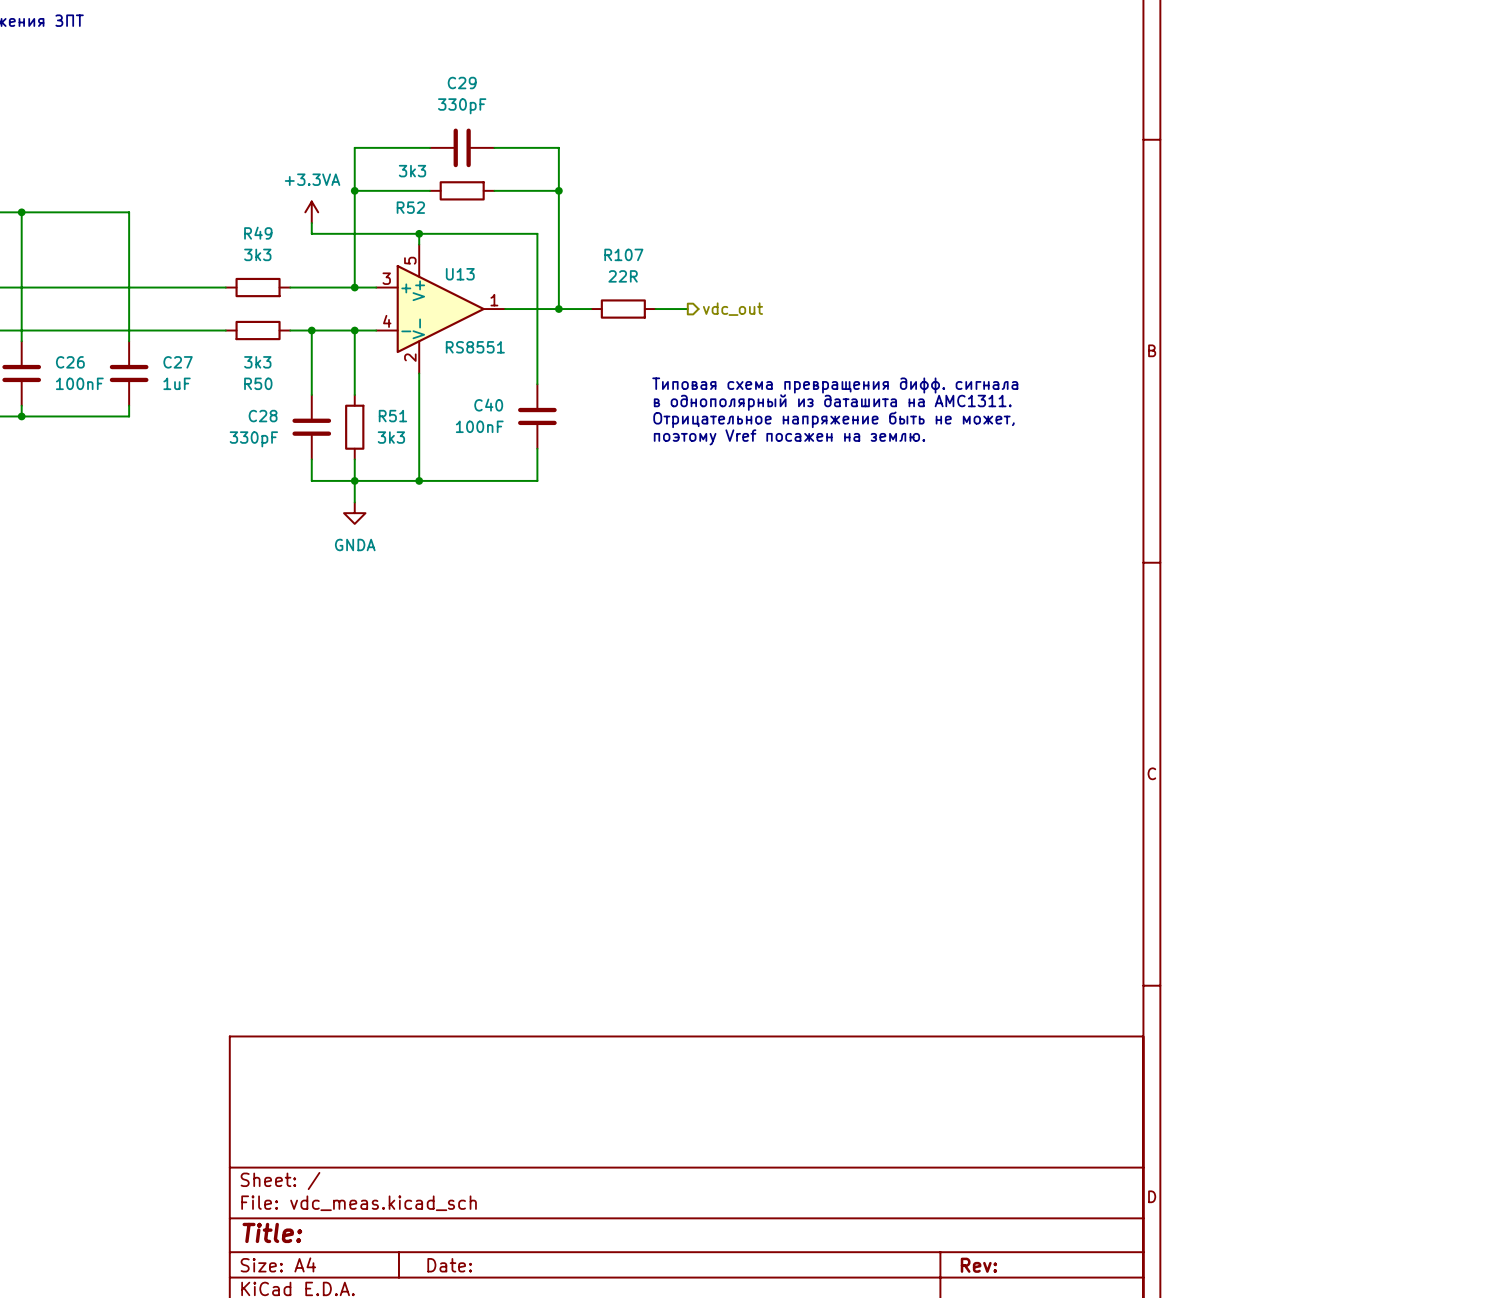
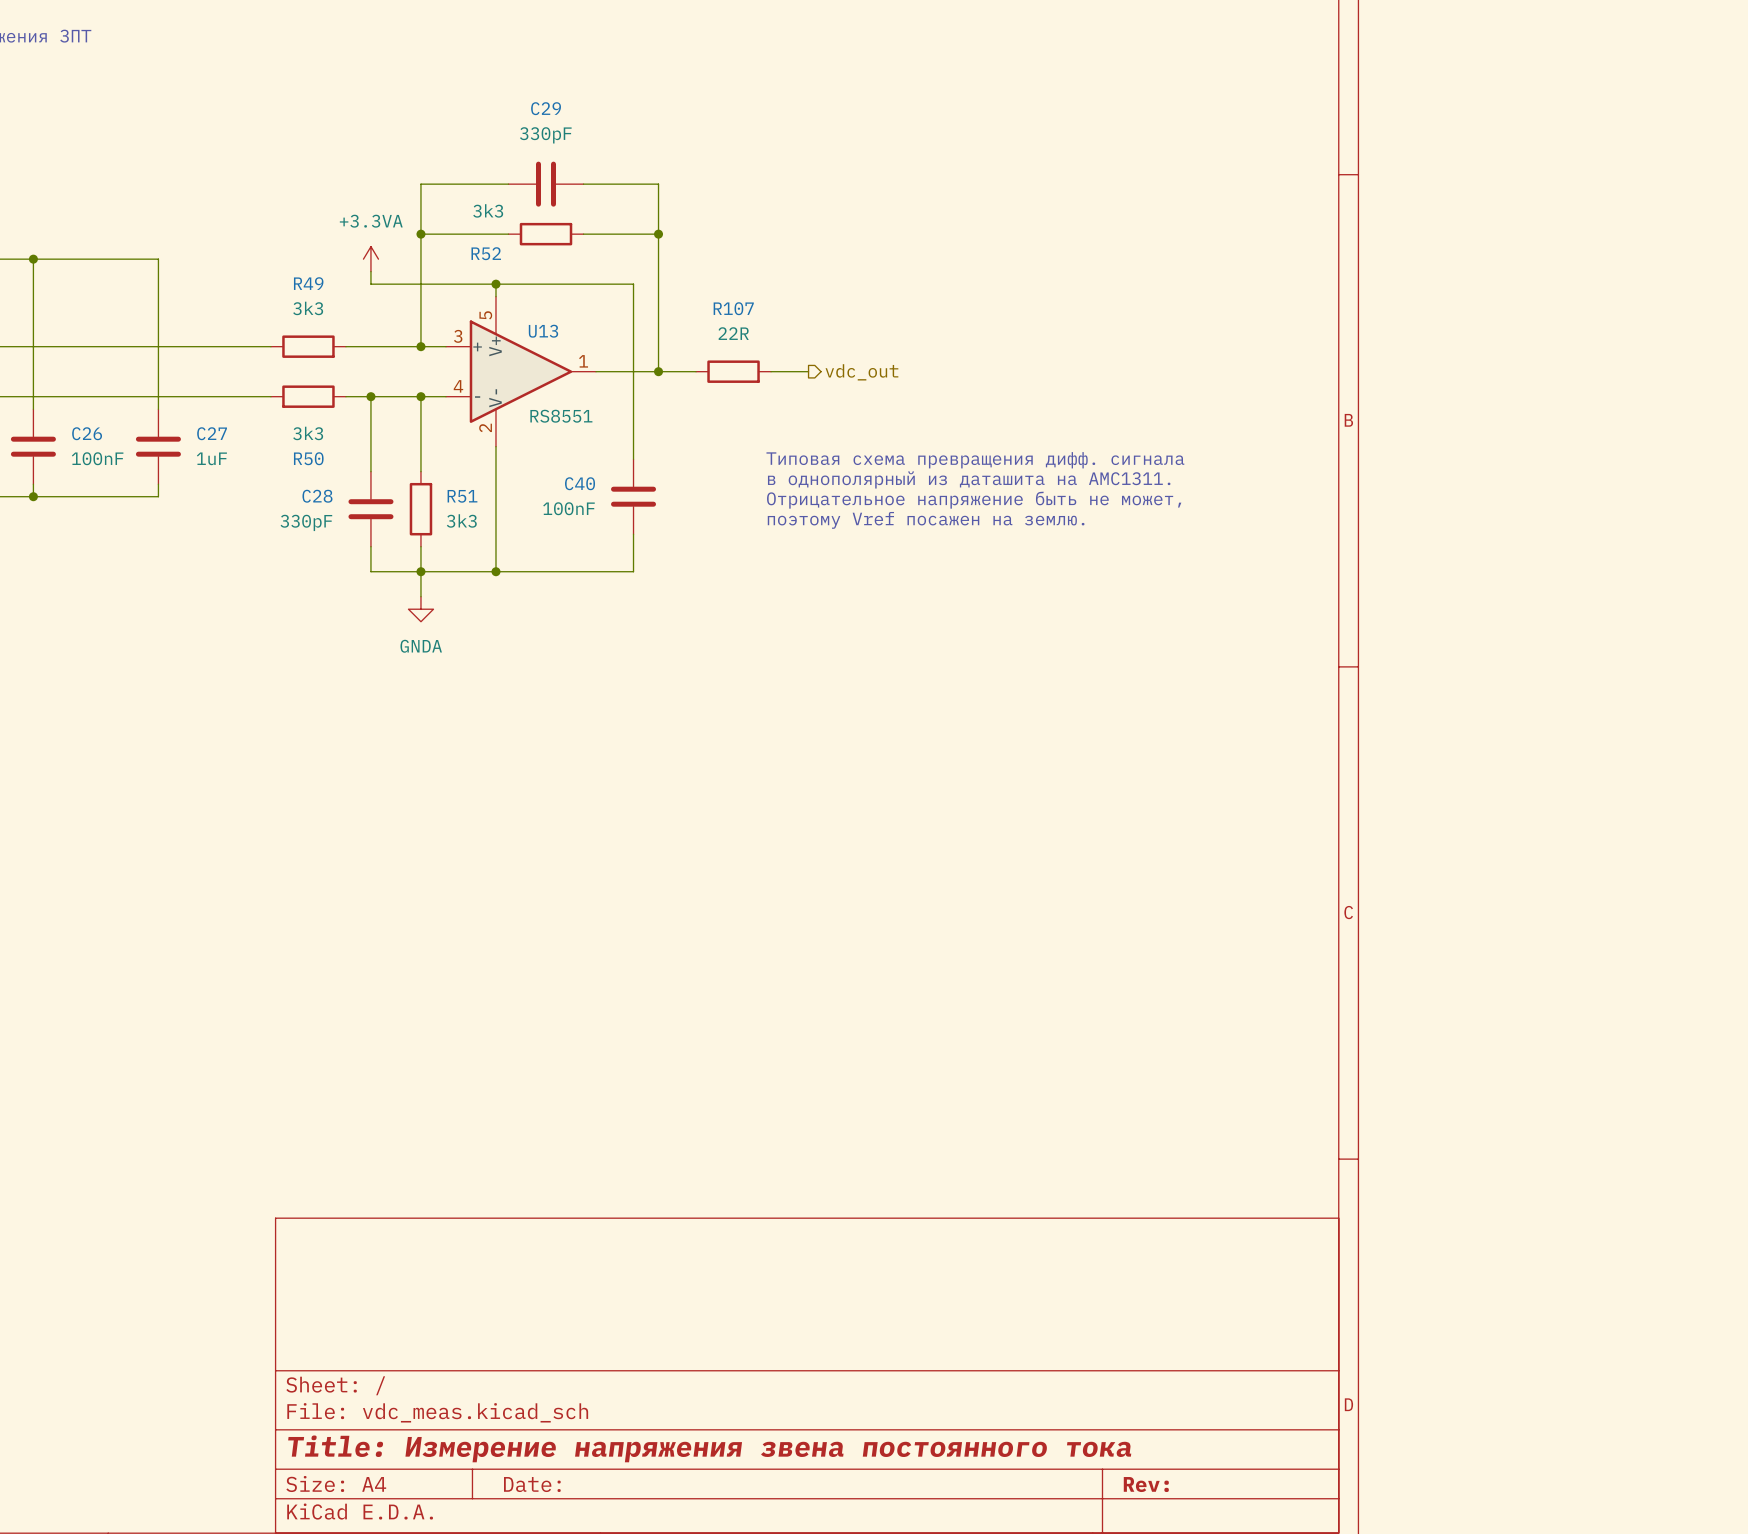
title block: Title: (272, 1232) -> Title: Измерение напряжения звена постоянного тока (709, 1448)

